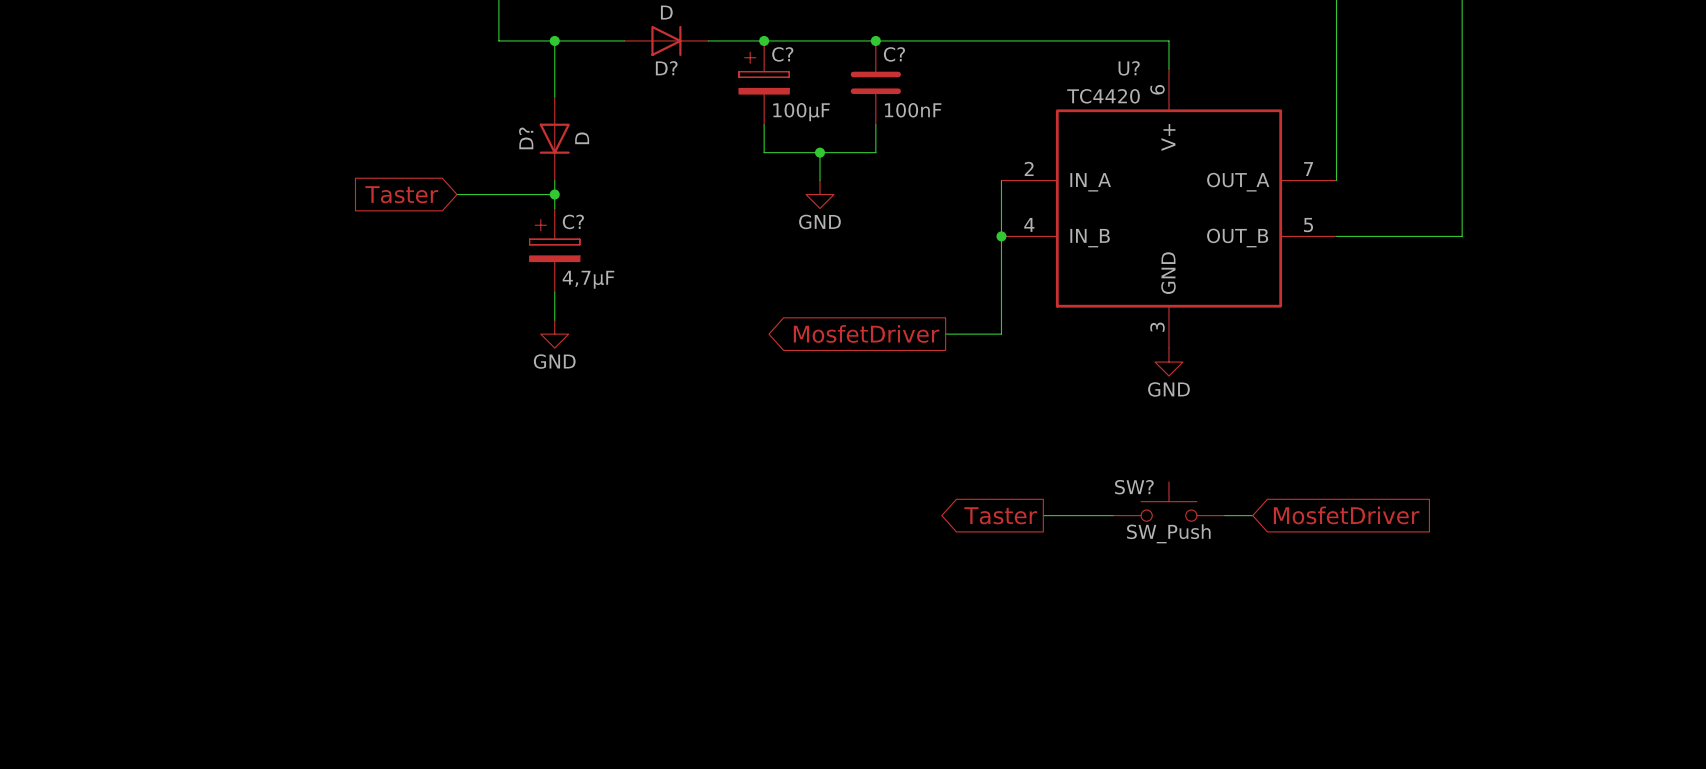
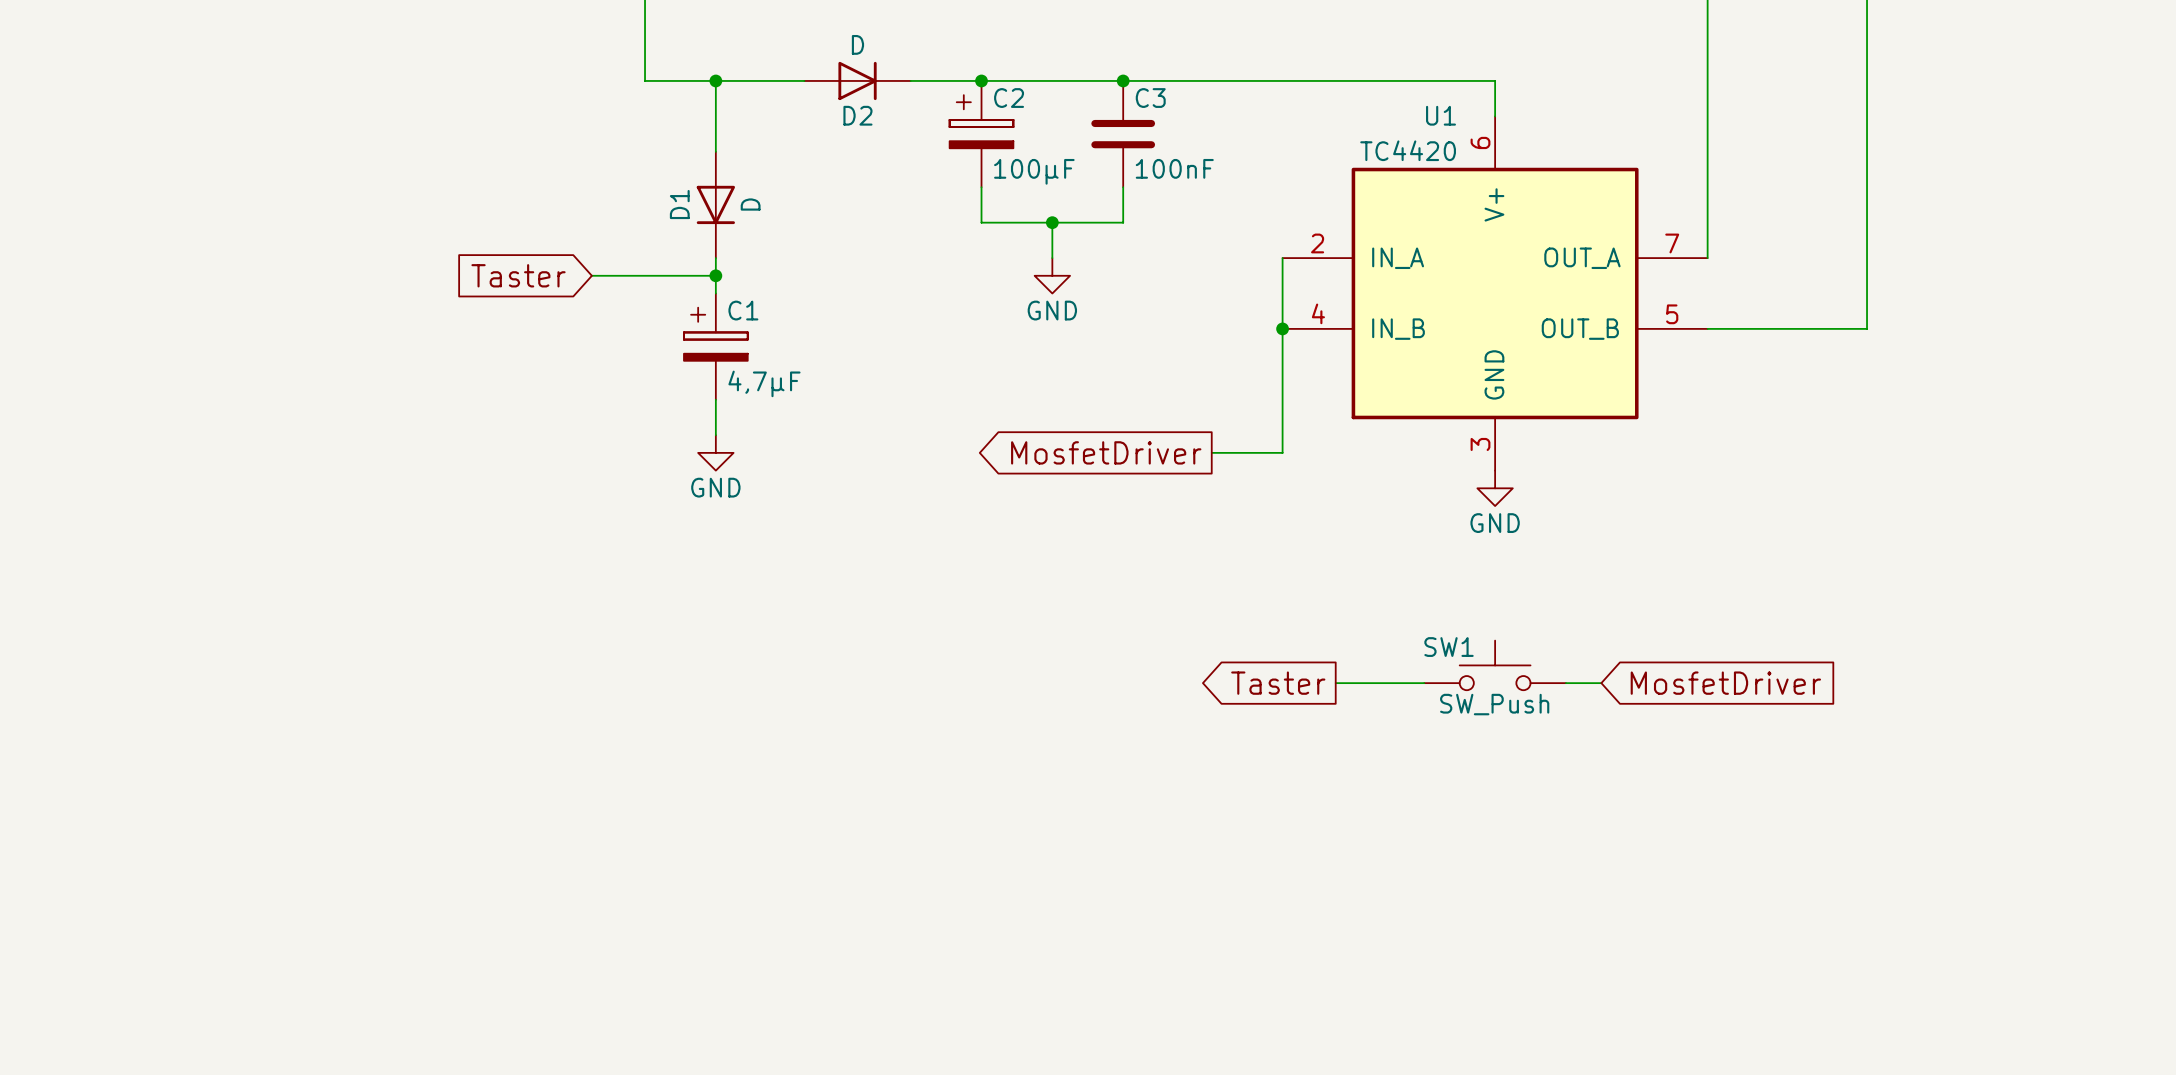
C? name: C? (782, 54) -> C2 (1009, 98)
C? name: C? (894, 54) -> C3 (1150, 98)
D? name: D? (666, 68) -> D2 (857, 115)
U? name: U? (1129, 68) -> U1 (1441, 115)
D? name: D? (526, 138) -> D1 (679, 204)
C? name: C? (573, 221) -> C1 (743, 310)
SW? name: SW? (1134, 487) -> SW1 (1449, 647)

